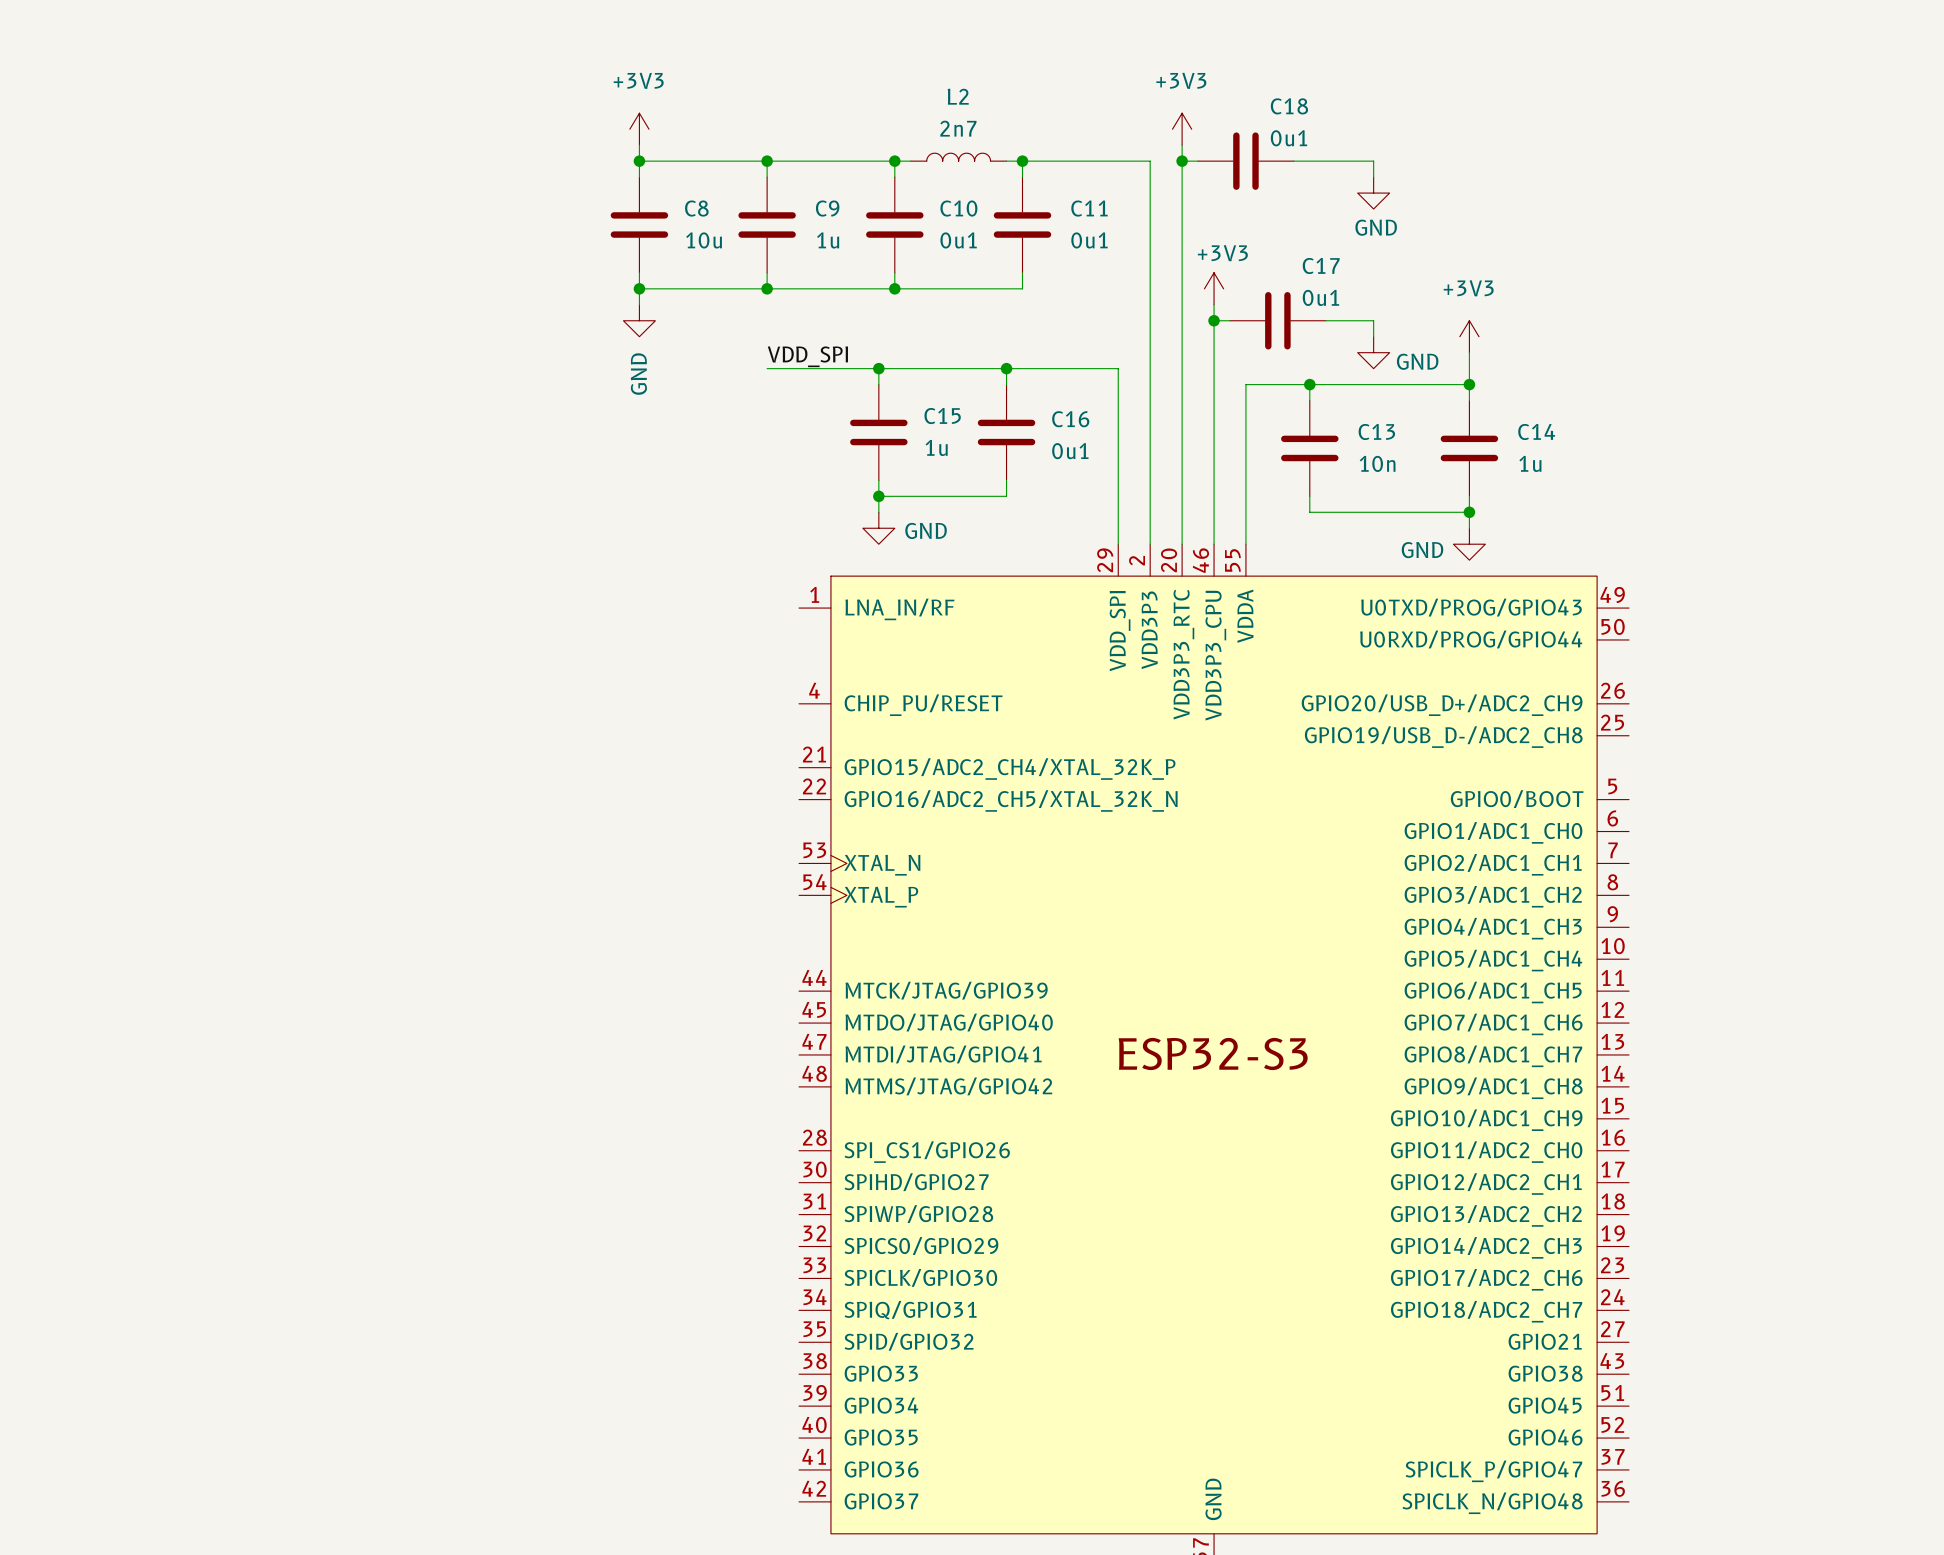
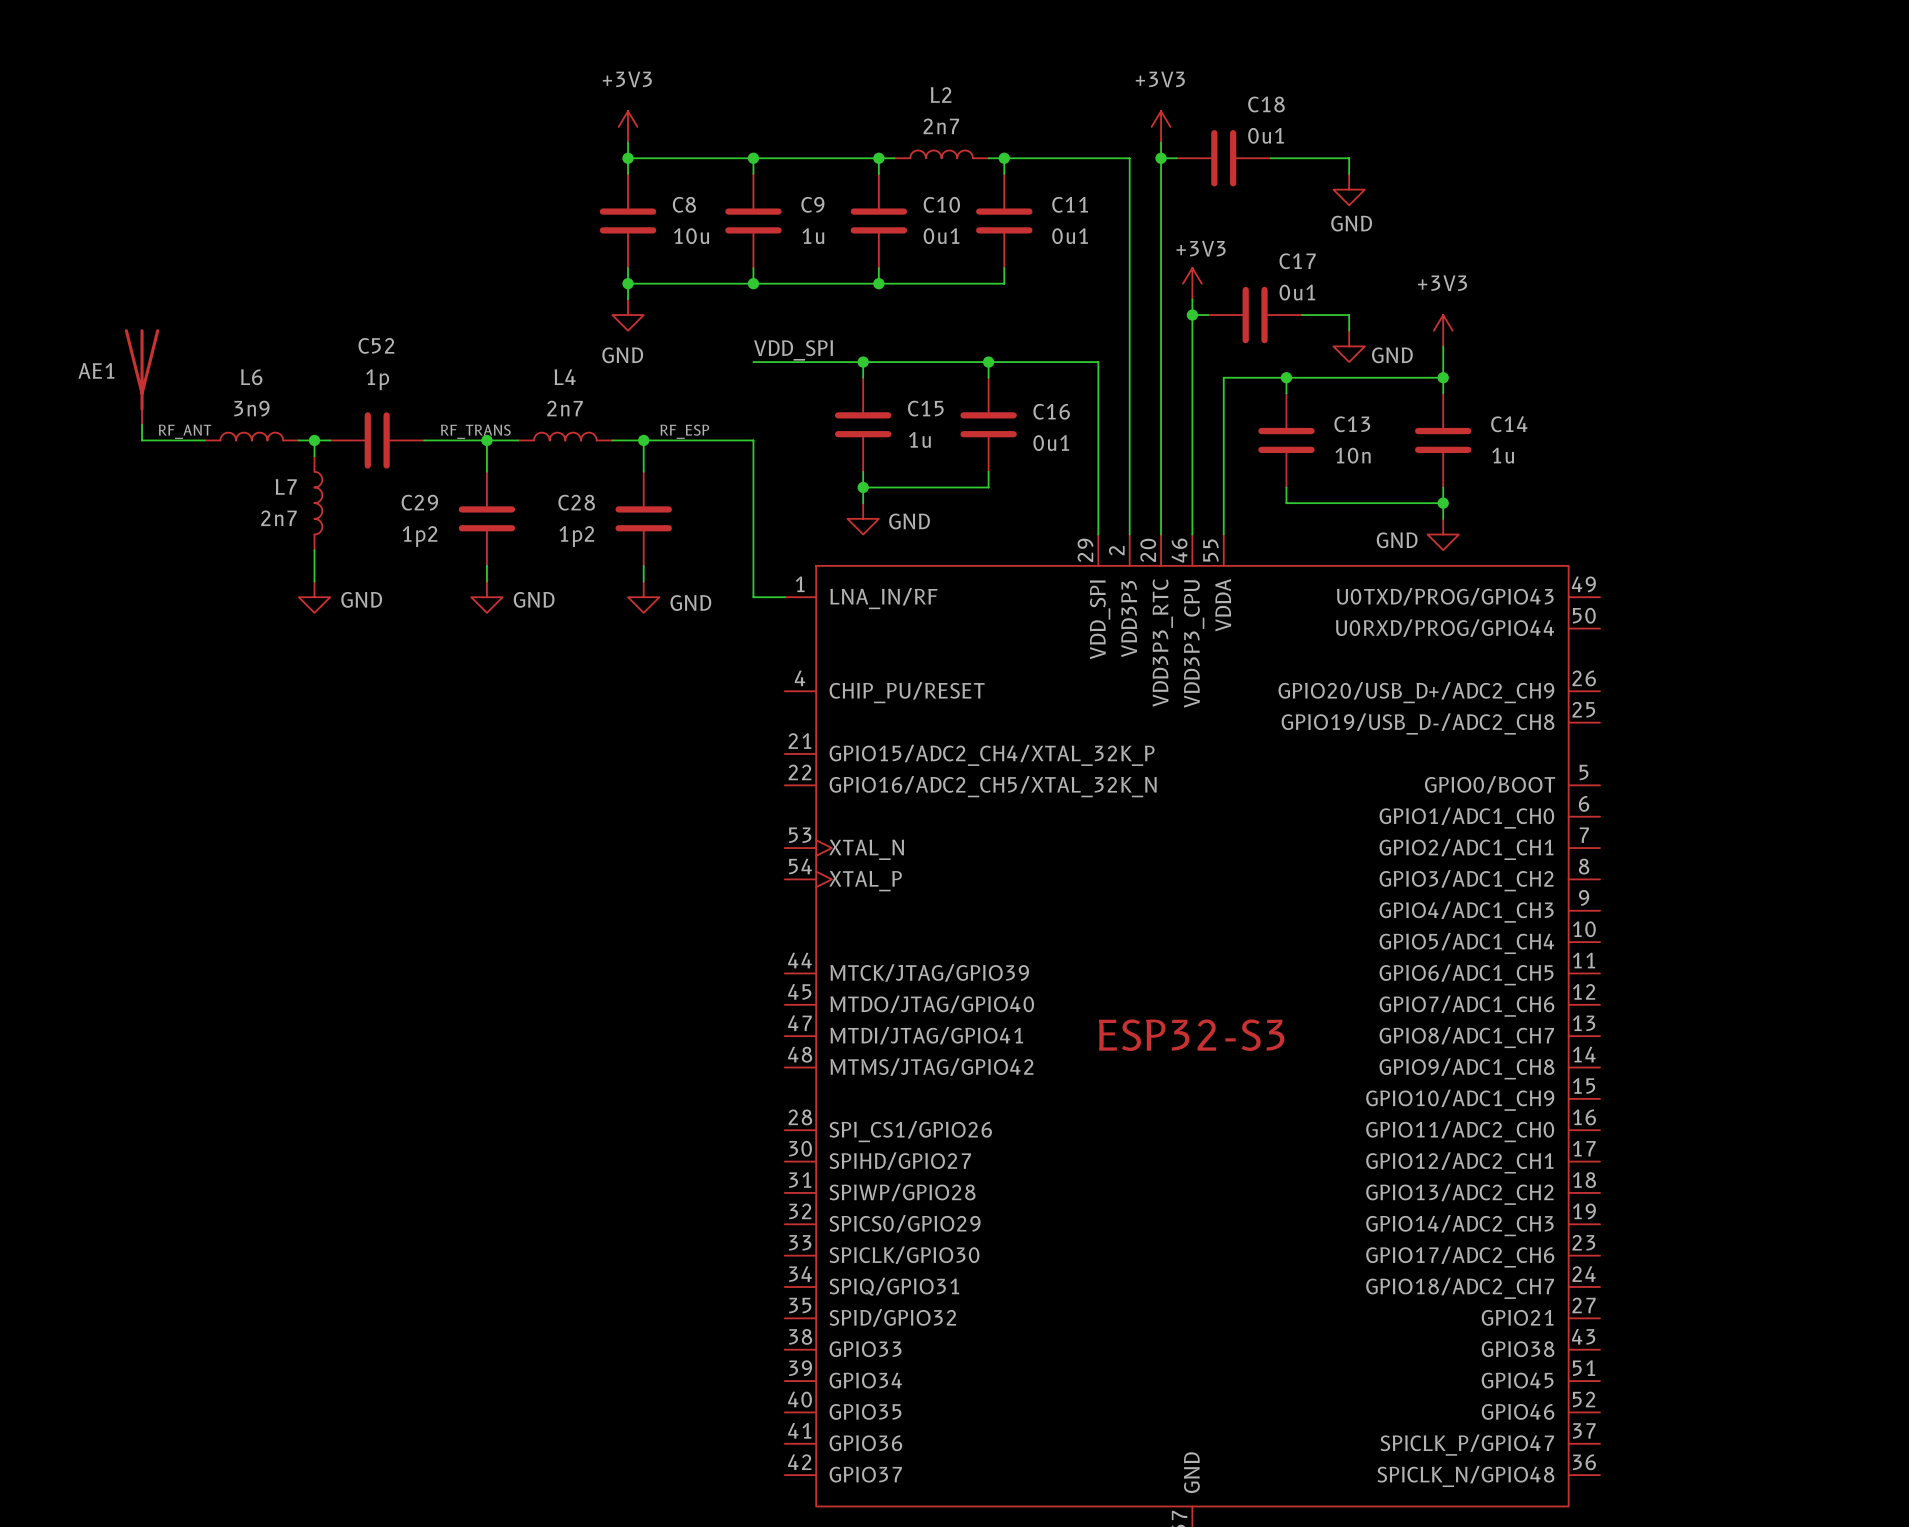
power symbol text rotation: 0° (638, 374) -> 90° clockwise (622, 355)
AE1: none -> (142, 376)
wire: none -> (142, 424) (142, 440) (204, 440)
label: none -> RF_ANT (185, 431)
label: none -> RF_TRANS (475, 431)
label: none -> RF_ESP (684, 431)
L6: none -> 3n9 (251, 436)
L4: none -> 2n7 (565, 436)
wire: none -> (298, 440) (330, 440)
wire: none -> (314, 440) (314, 456)
junction: none -> (314, 440)
C52: none -> 1p (377, 440)
wire: none -> (424, 440) (518, 440)
wire: none -> (486, 440) (486, 471)
junction: none -> (486, 440)
wire: none -> (612, 440) (753, 440) (753, 597) (784, 597)
wire: none -> (643, 440) (643, 471)
junction: none -> (643, 440)
L7: none -> 2n7 (318, 503)
C29: none -> 1p2 (486, 518)
C28: none -> 1p2 (643, 518)
wire: none -> (314, 550) (314, 581)
wire: none -> (486, 565) (486, 581)
wire: none -> (643, 565) (643, 581)
power symbol: none -> GND (314, 597)
power symbol: none -> GND (486, 597)
power symbol: none -> GND (643, 597)

